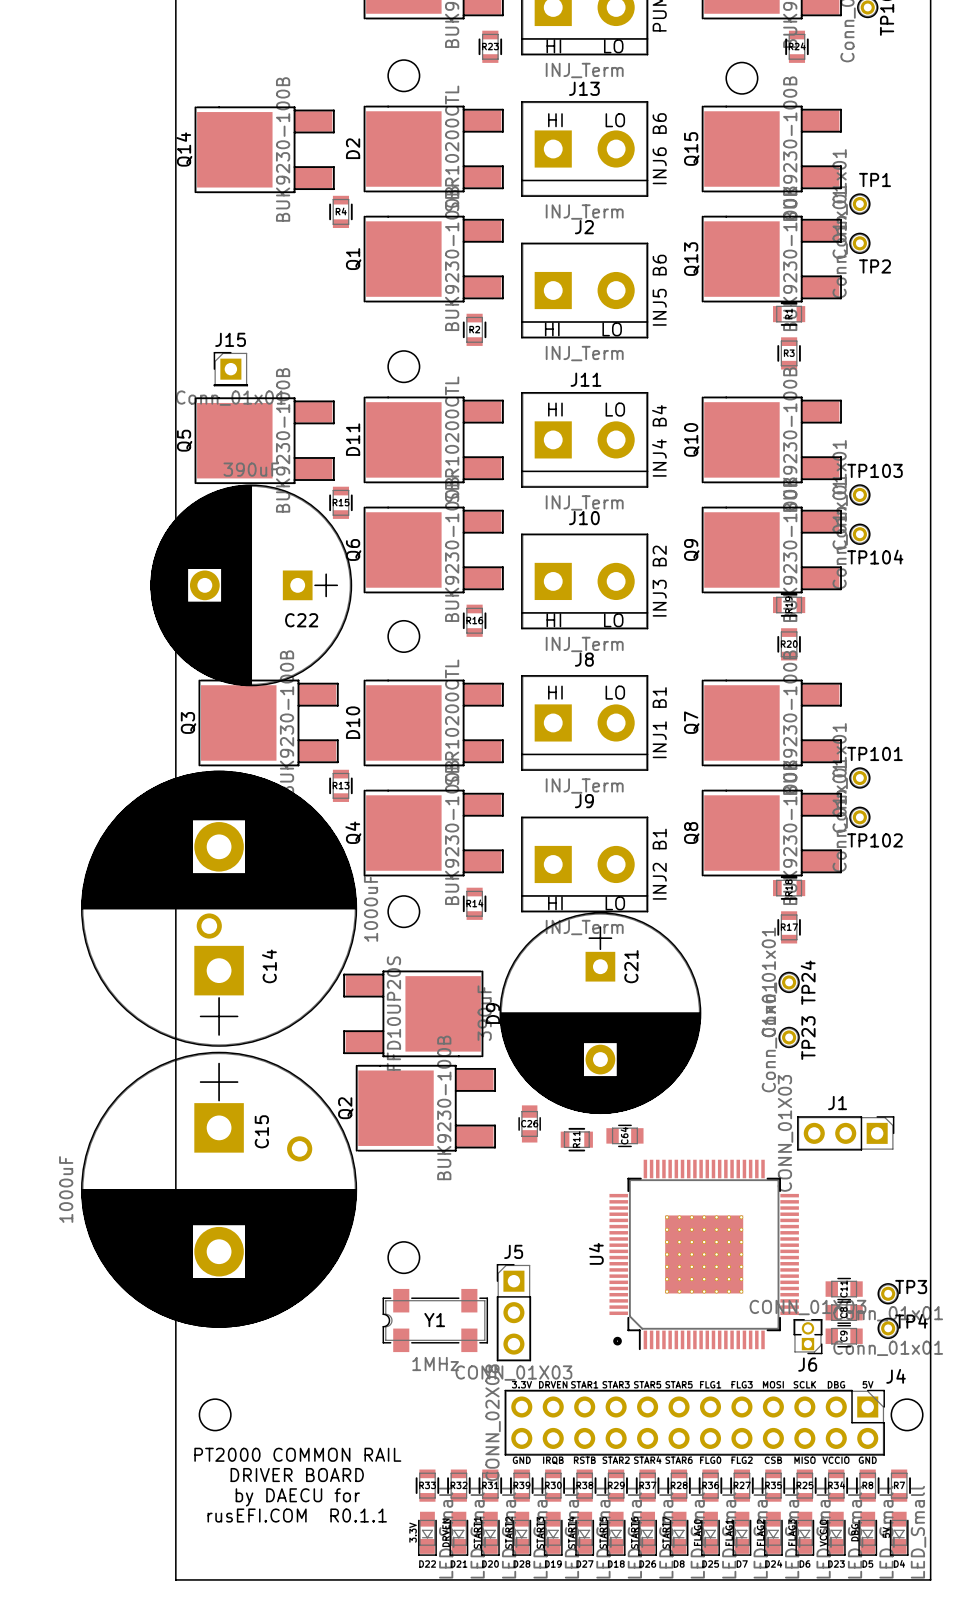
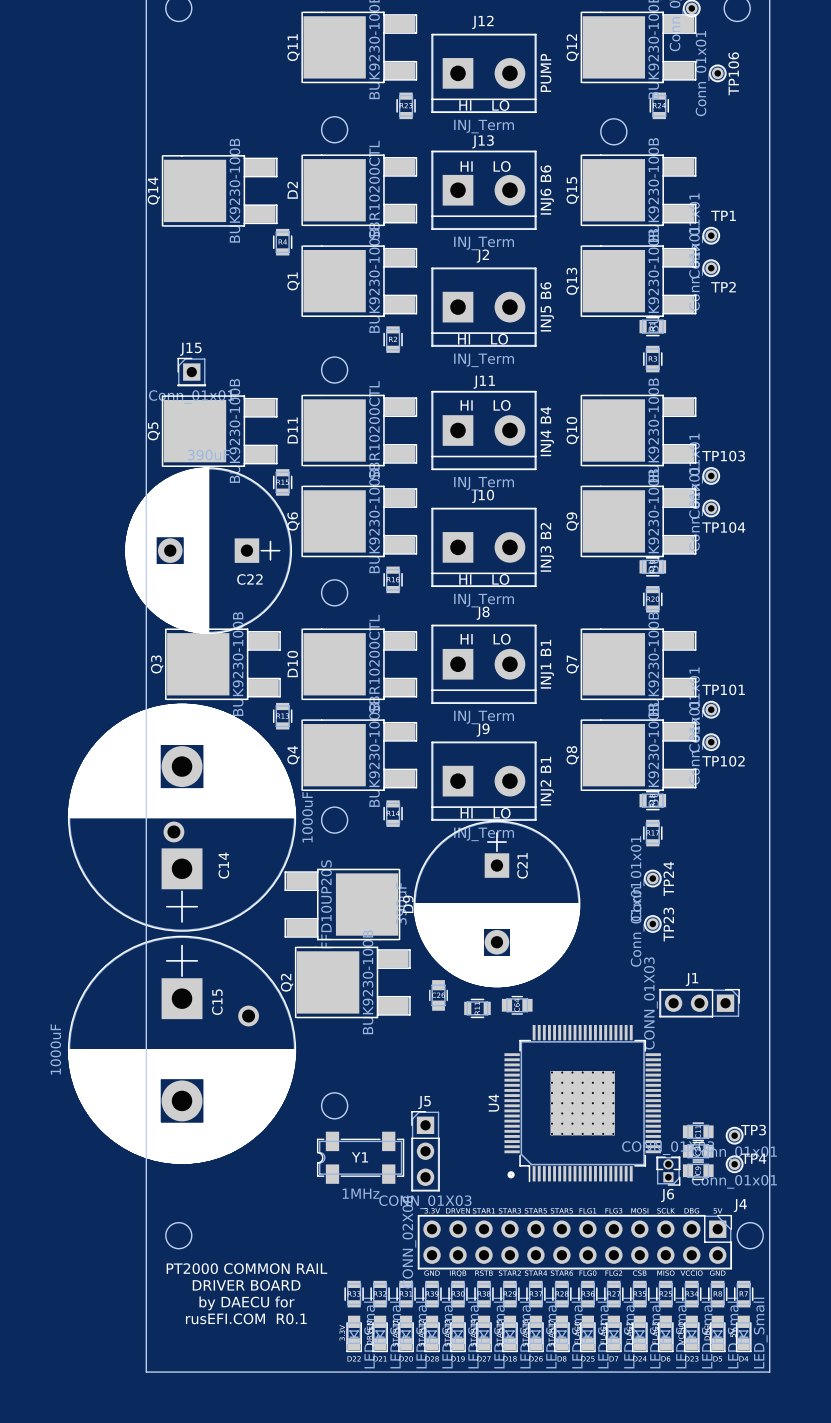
text: rusEFI.COM R0.1.1 (297, 1515) -> rusEFI.COM R0.1 (246, 1318)

